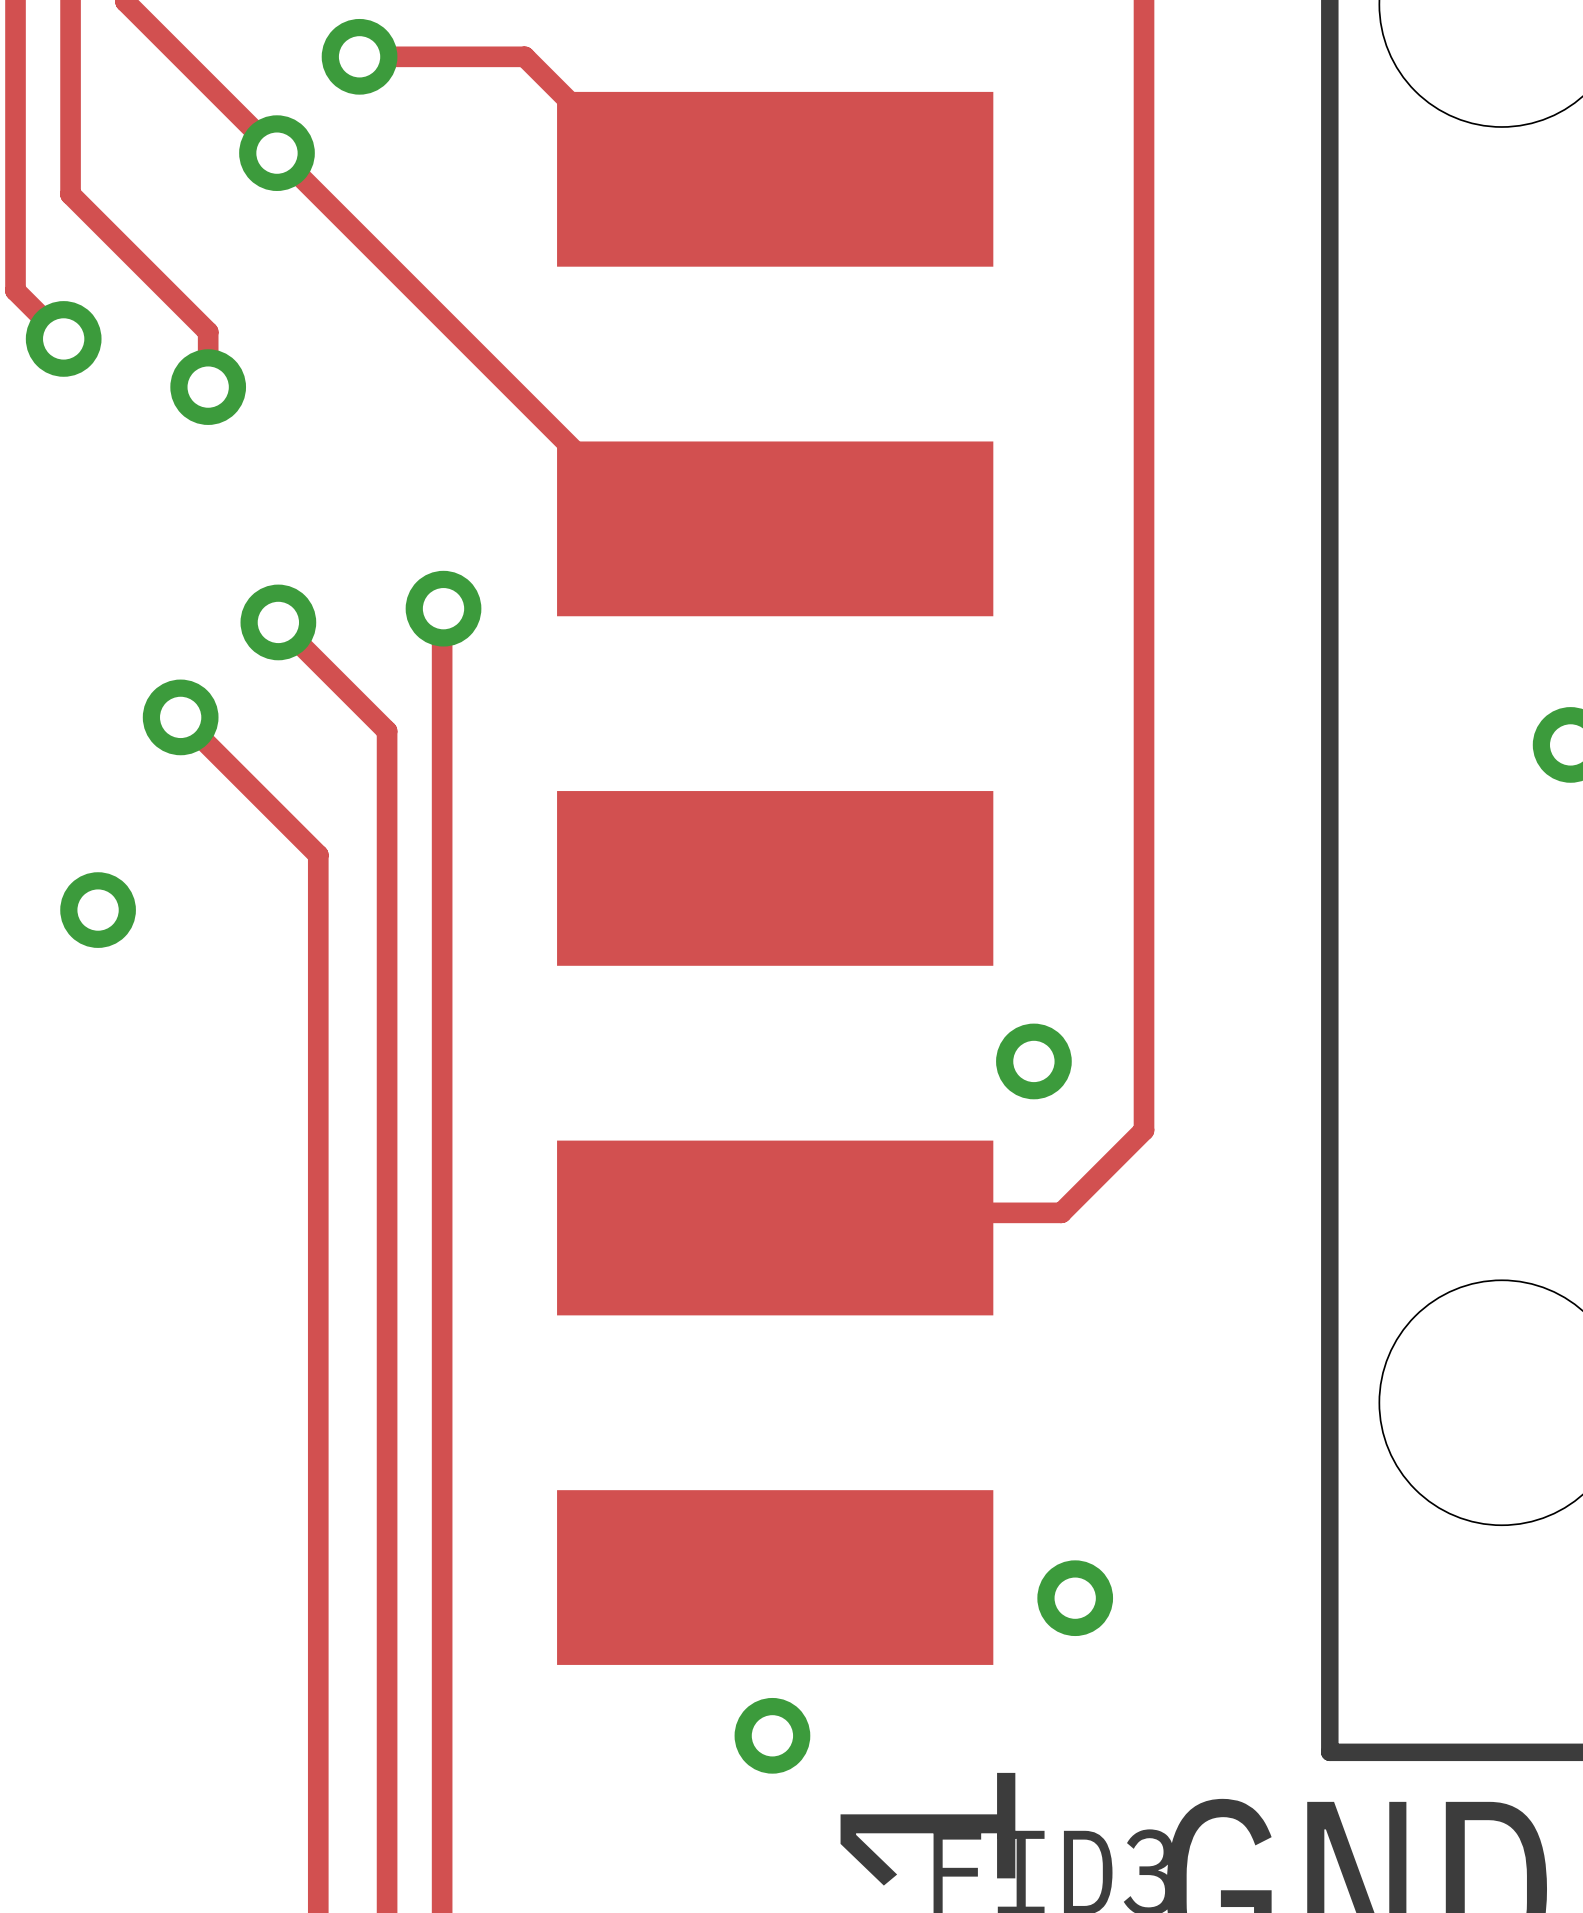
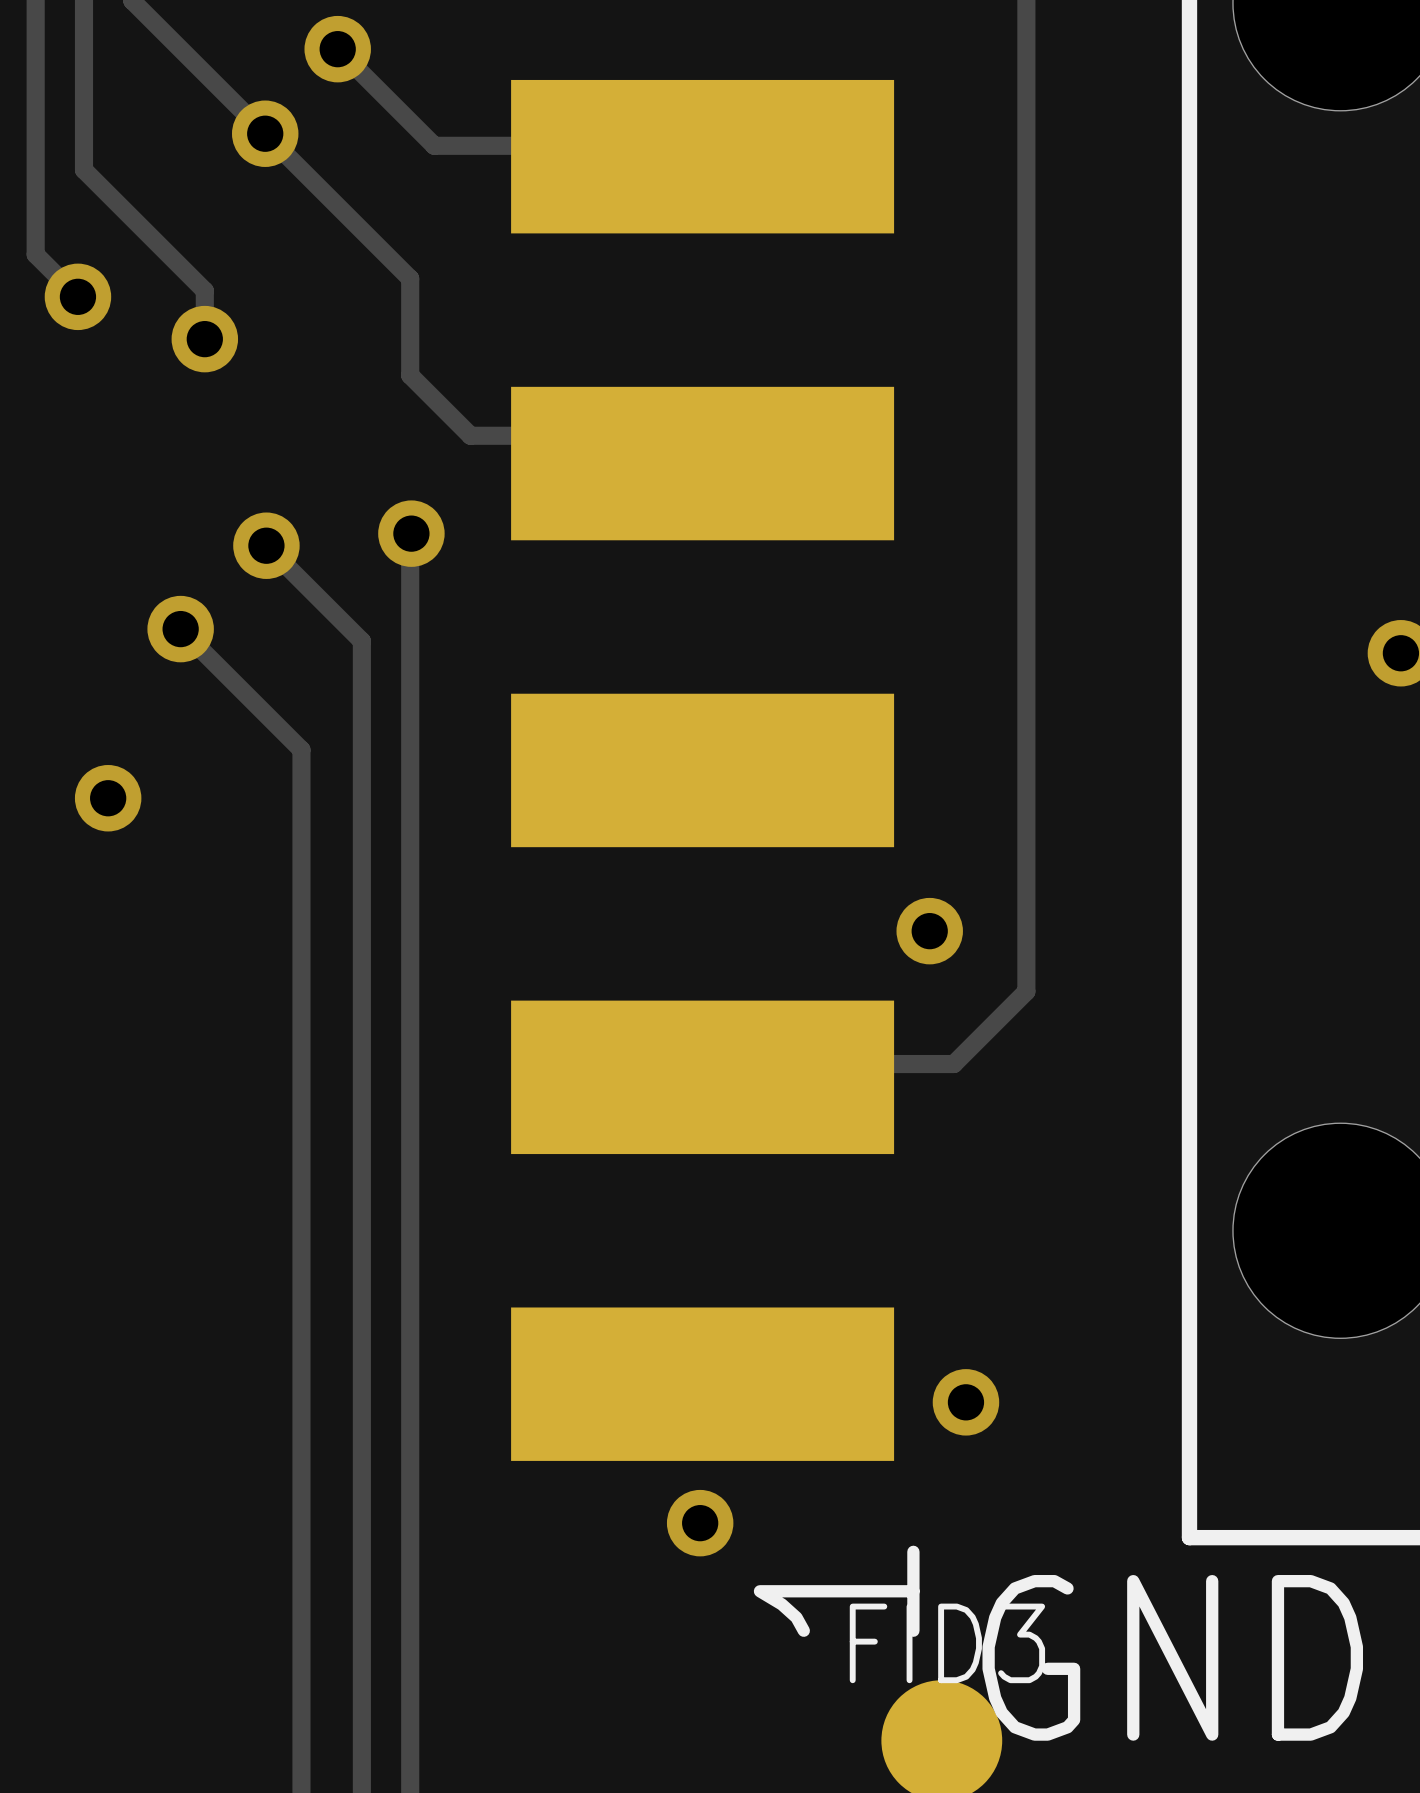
track: (359, 56) (524, 56) (634, 166) -> (337, 49) (434, 145) (579, 145)
track: (442, 318) (621, 497) -> (410, 278) (410, 375) (470, 435) (567, 435)

